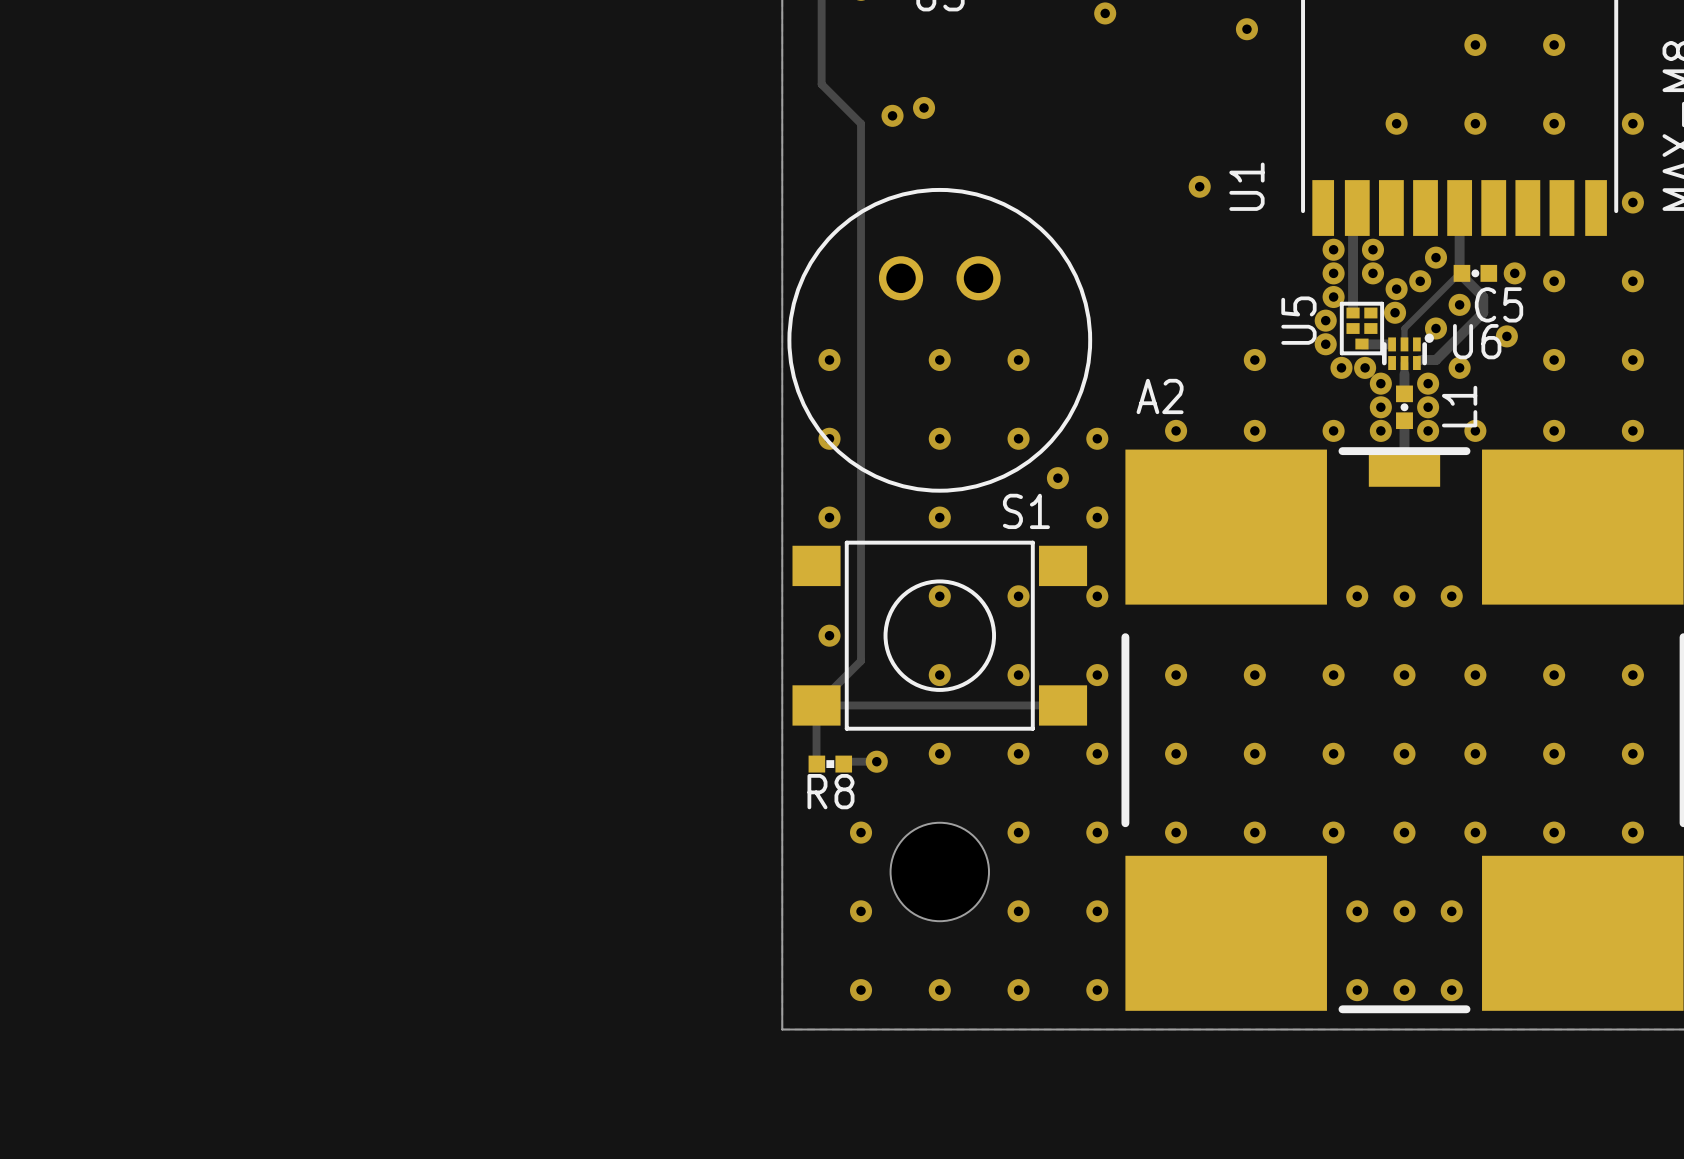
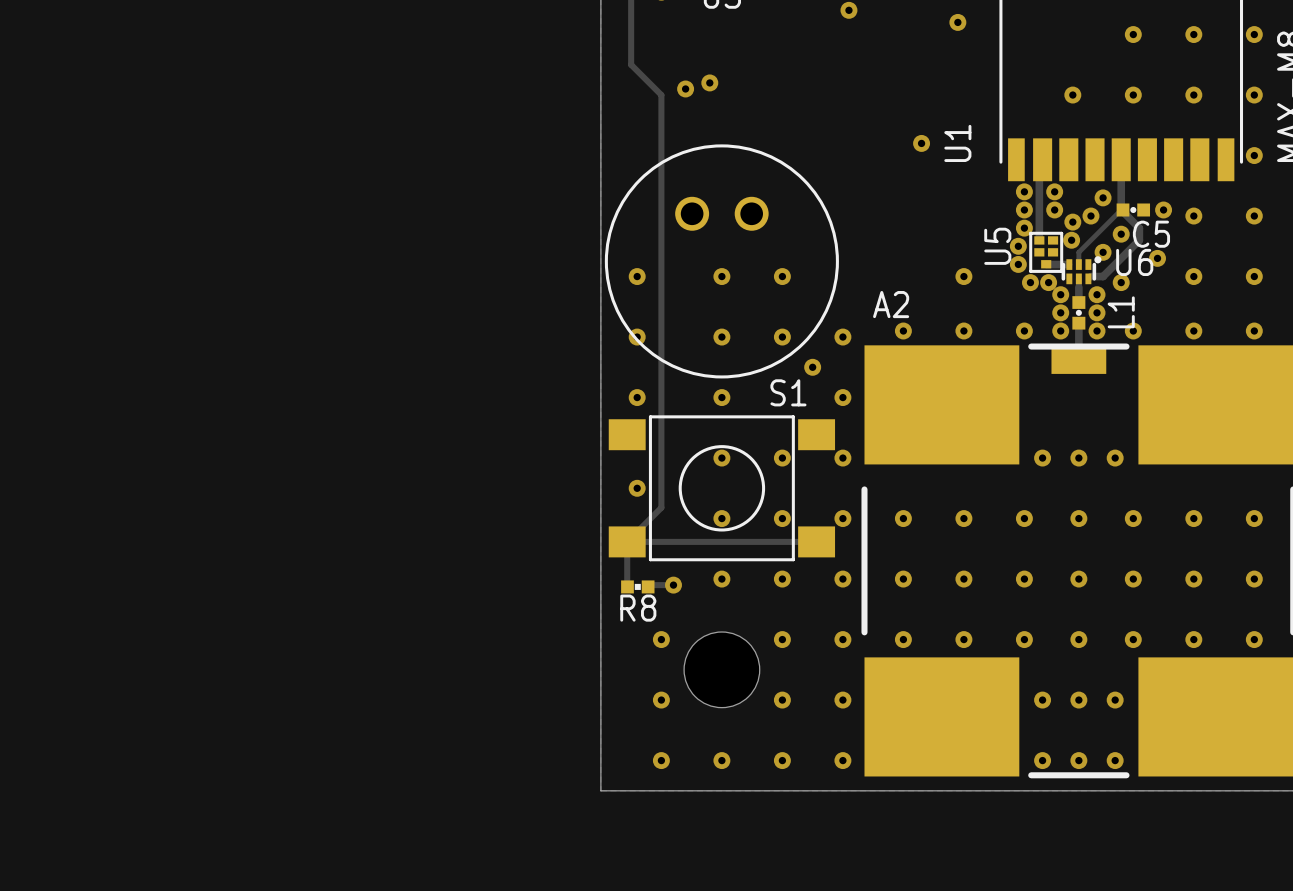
via: none -> (1254, 34)

